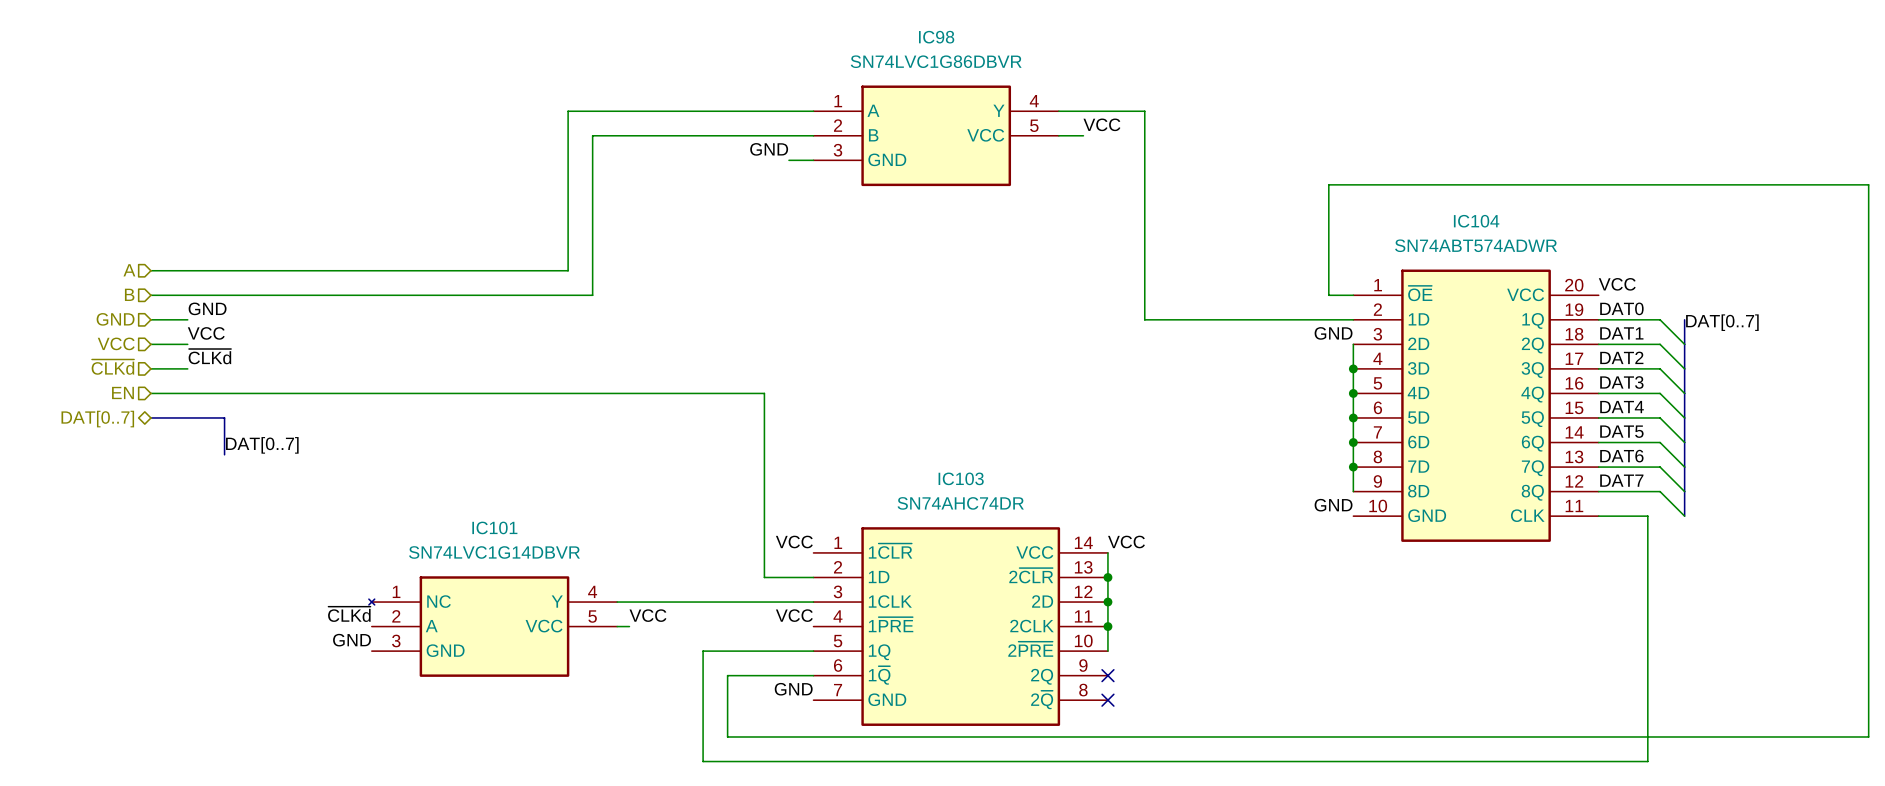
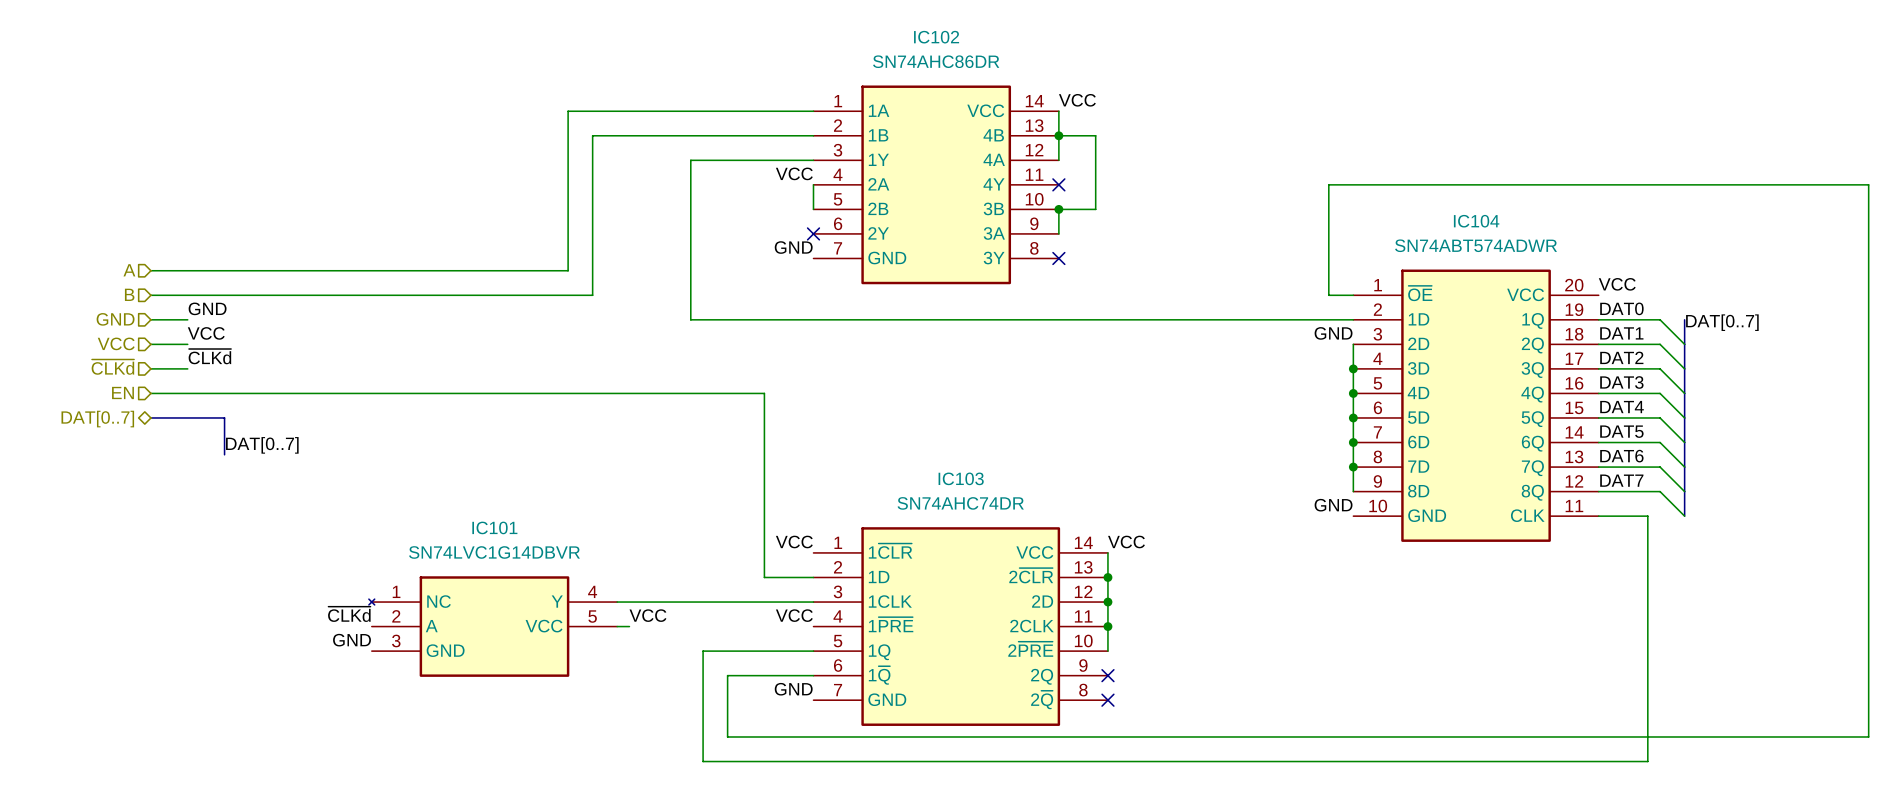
wire: (1058, 111) (1144, 111) (1144, 319) -> (1058, 111) (1058, 160)
label position: VCC (1101, 124) -> VCC (1077, 100)
IC98: SN74LVC1G86DBVR (936, 135) -> none
junction: none -> (1058, 135)
wire: none -> (1083, 135) (1095, 135) (1095, 209) (1058, 209) (1058, 233)
label position: GND (769, 149) -> GND (793, 247)
wire: none -> (788, 160) (690, 160) (690, 319) (1144, 319)
label: none -> VCC (794, 173)
wire: none -> (813, 184) (813, 209)
IC102: none -> SN74AHC86DR (936, 184)
no-connect mark: none -> (1058, 184)
junction: none -> (1058, 209)
no-connect mark: none -> (813, 233)
no-connect mark: none -> (1058, 258)

